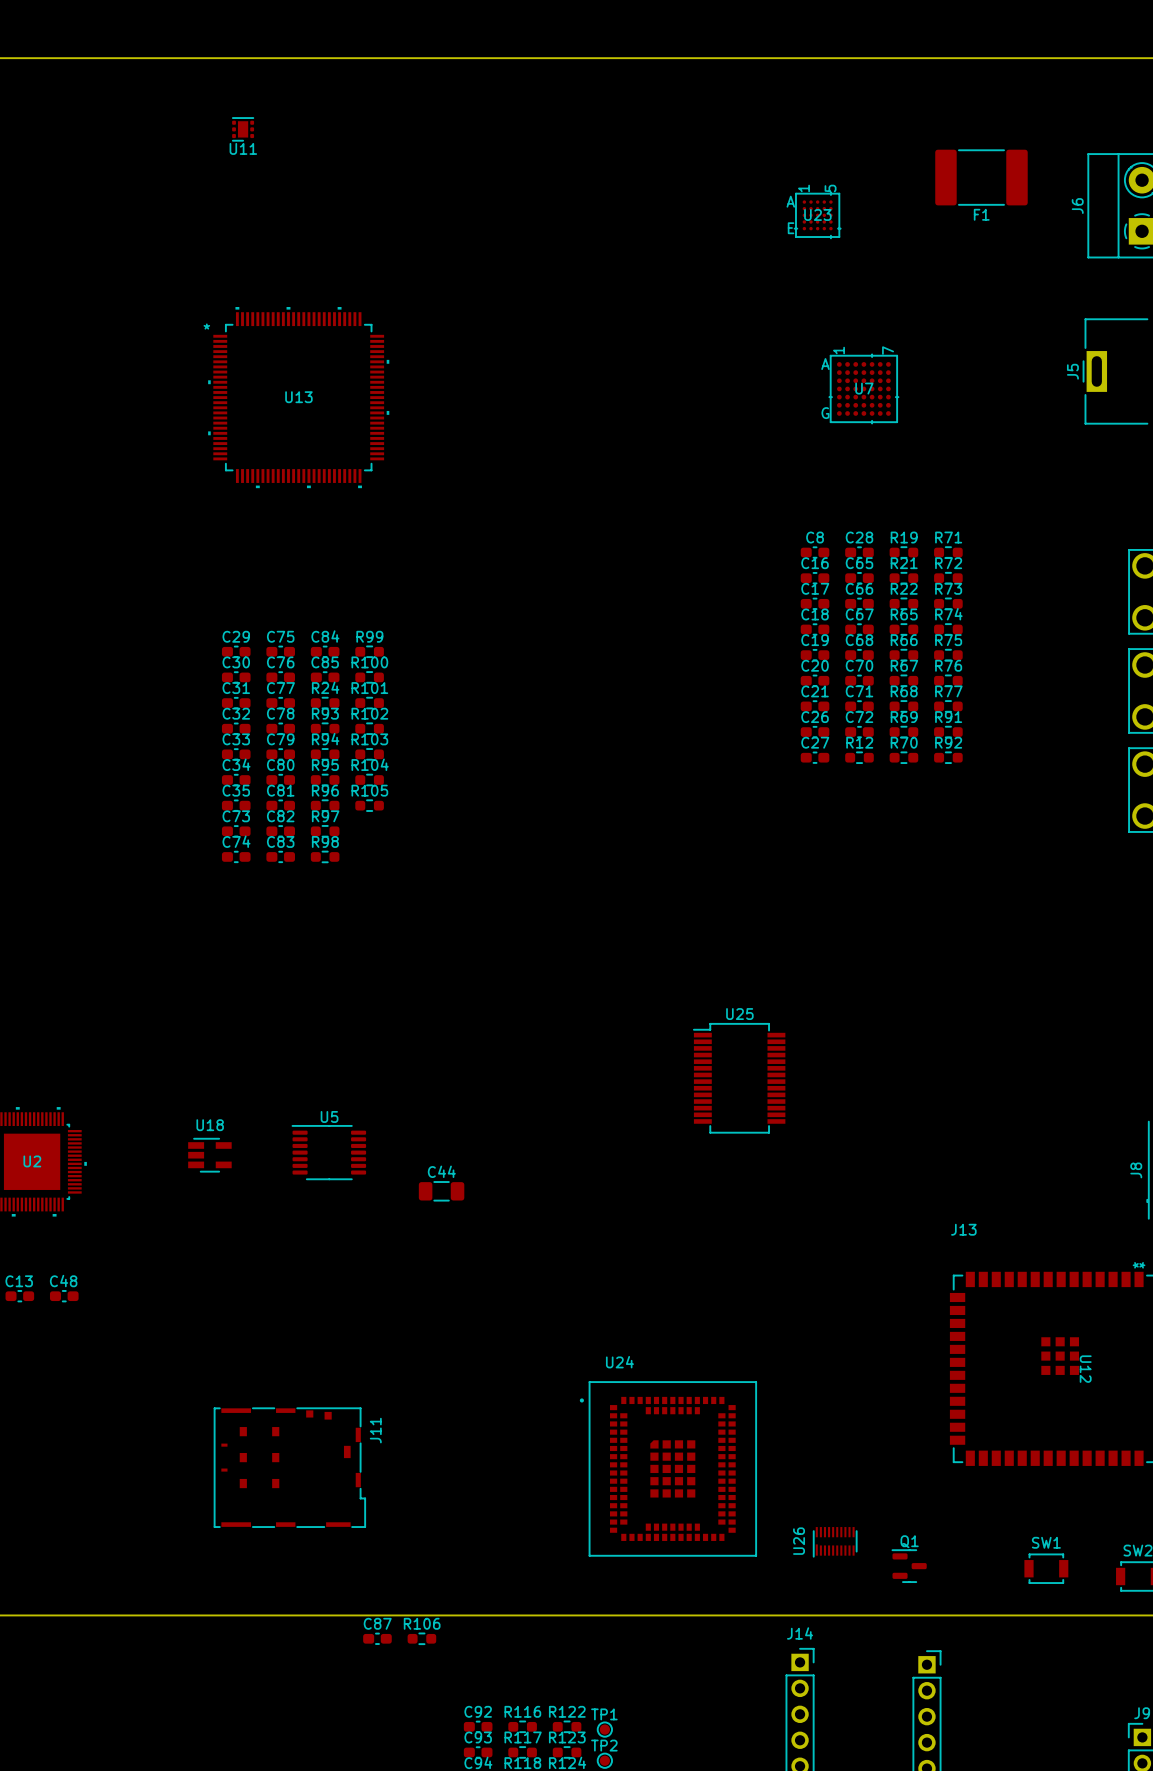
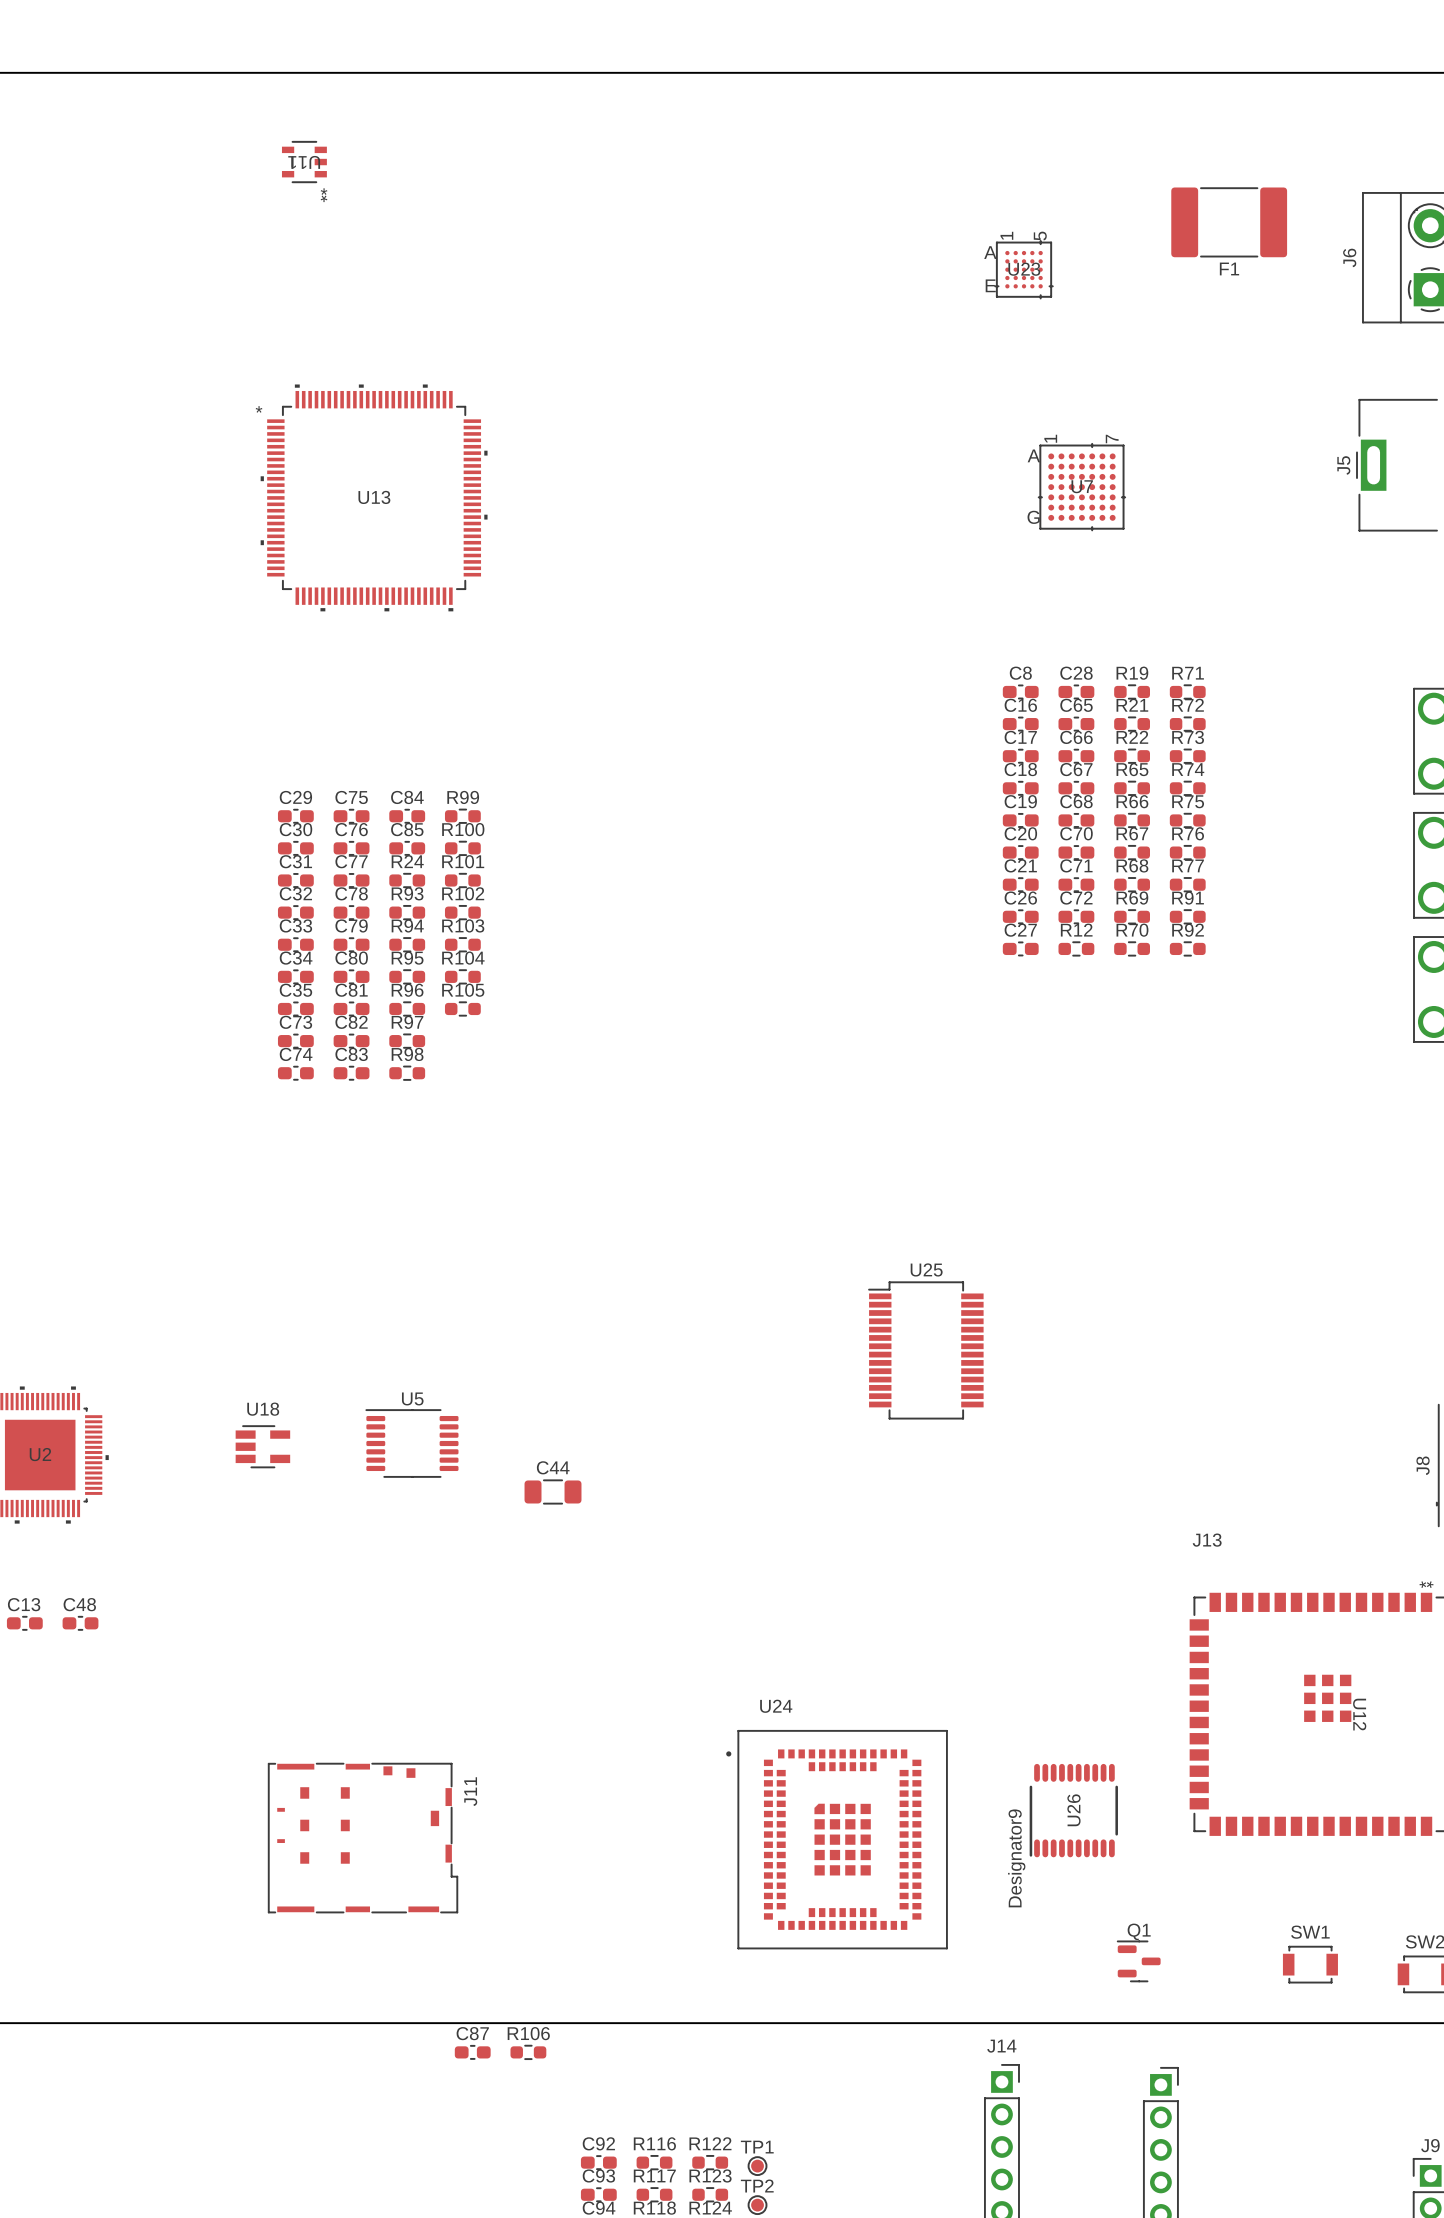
U11 footprint: [232, 117, 255, 142] -> [281, 140, 327, 184]
U26 footprint: [813, 1527, 858, 1558] -> [1029, 1763, 1118, 1858]
U26 name position: U26 (799, 1541) -> U26 (1073, 1810)

